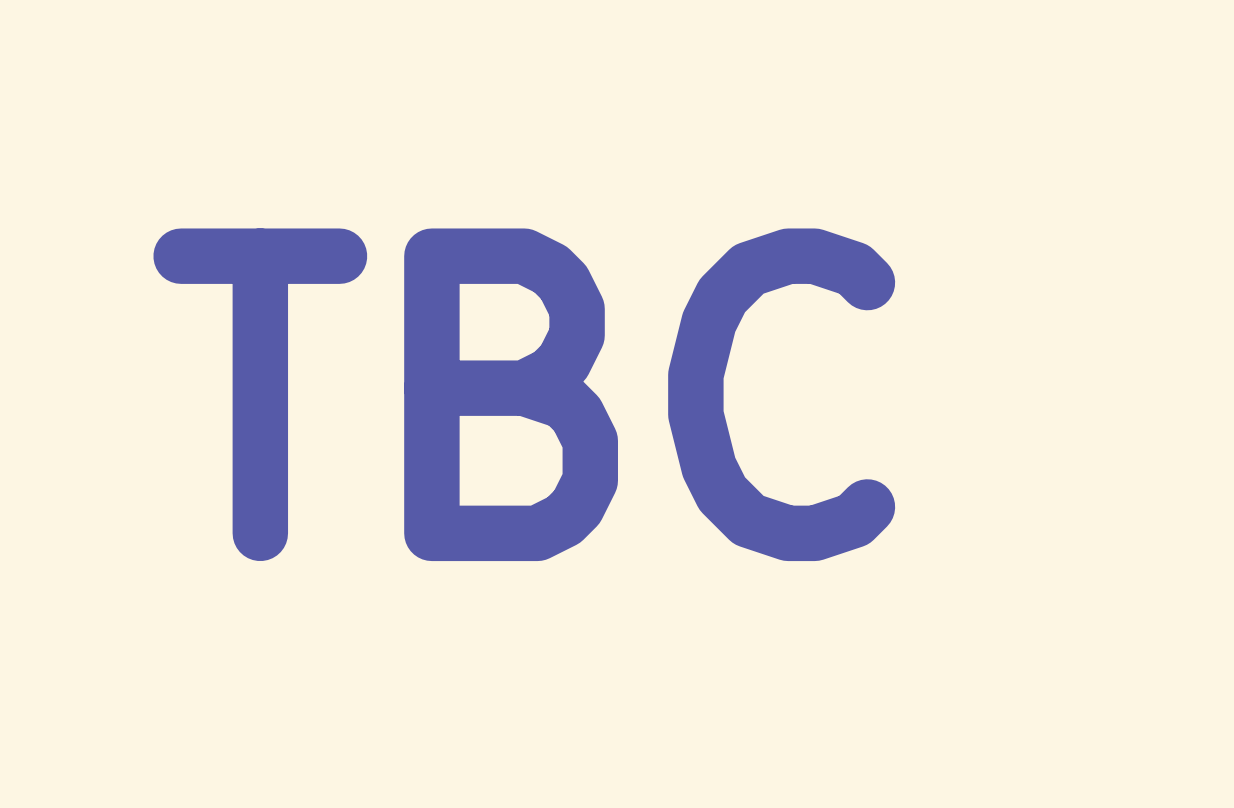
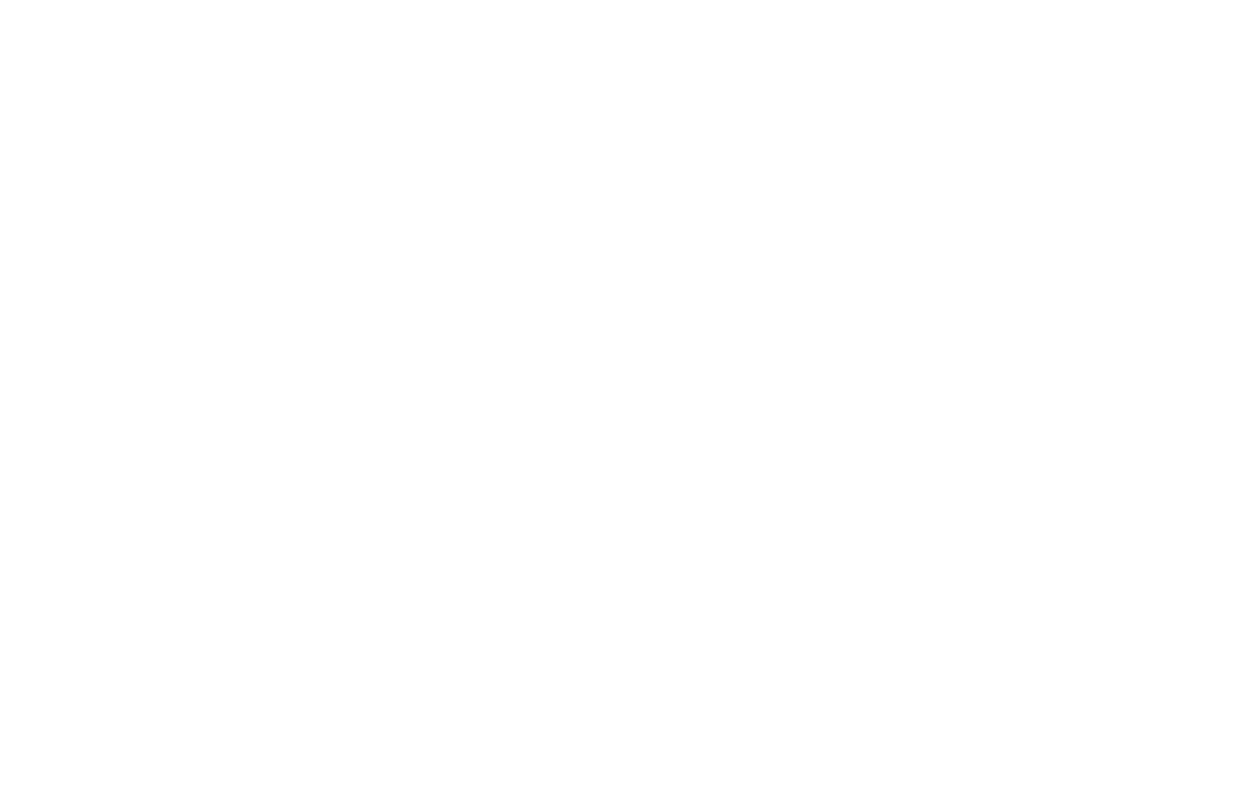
text: TBC (524, 394) -> none

